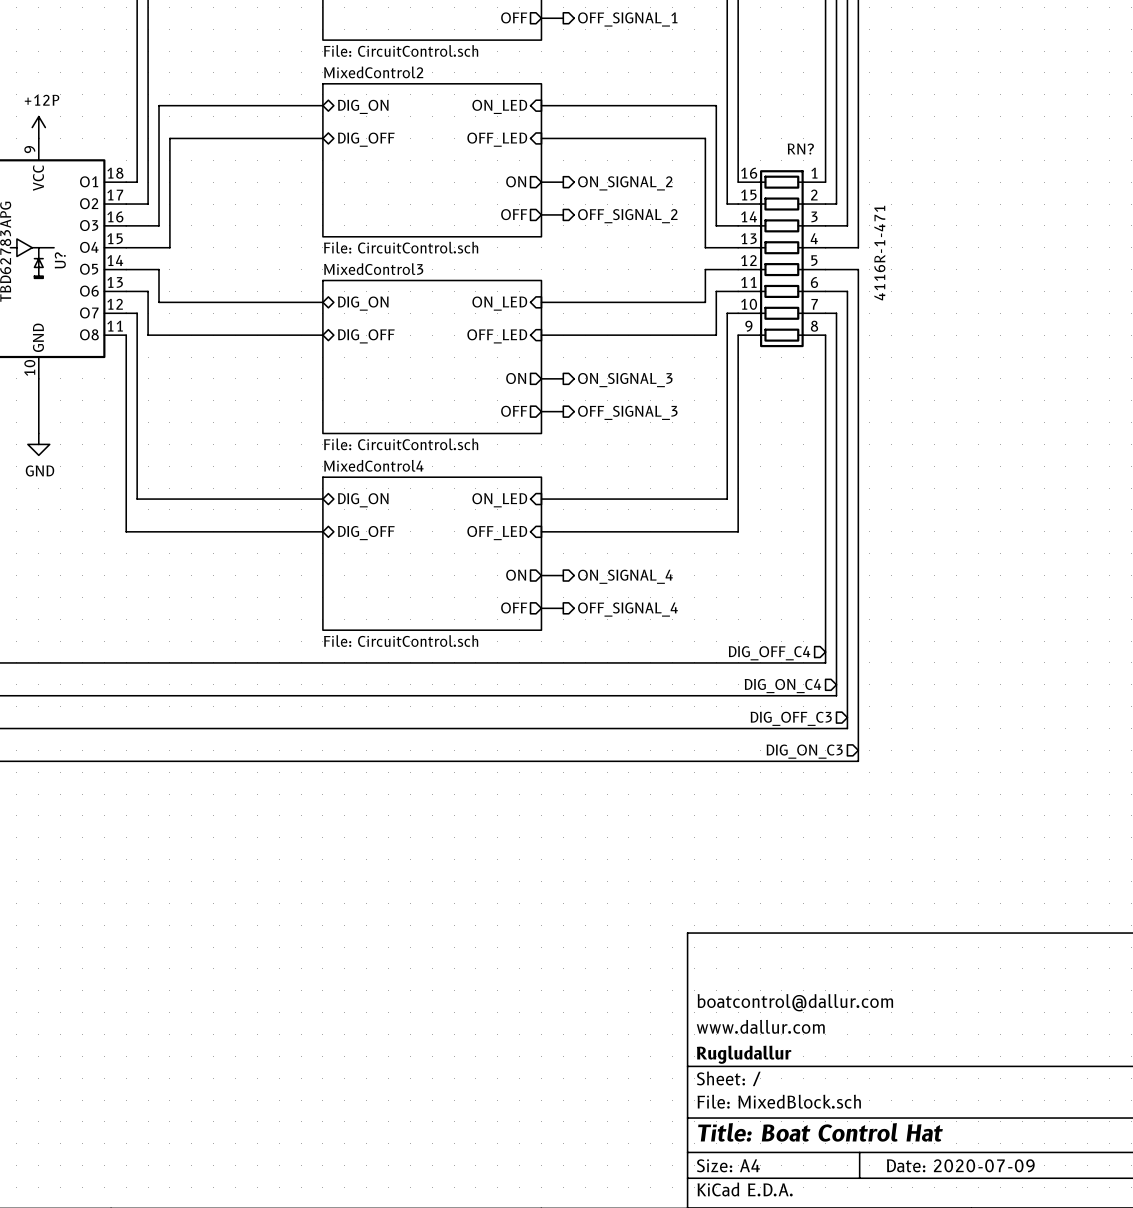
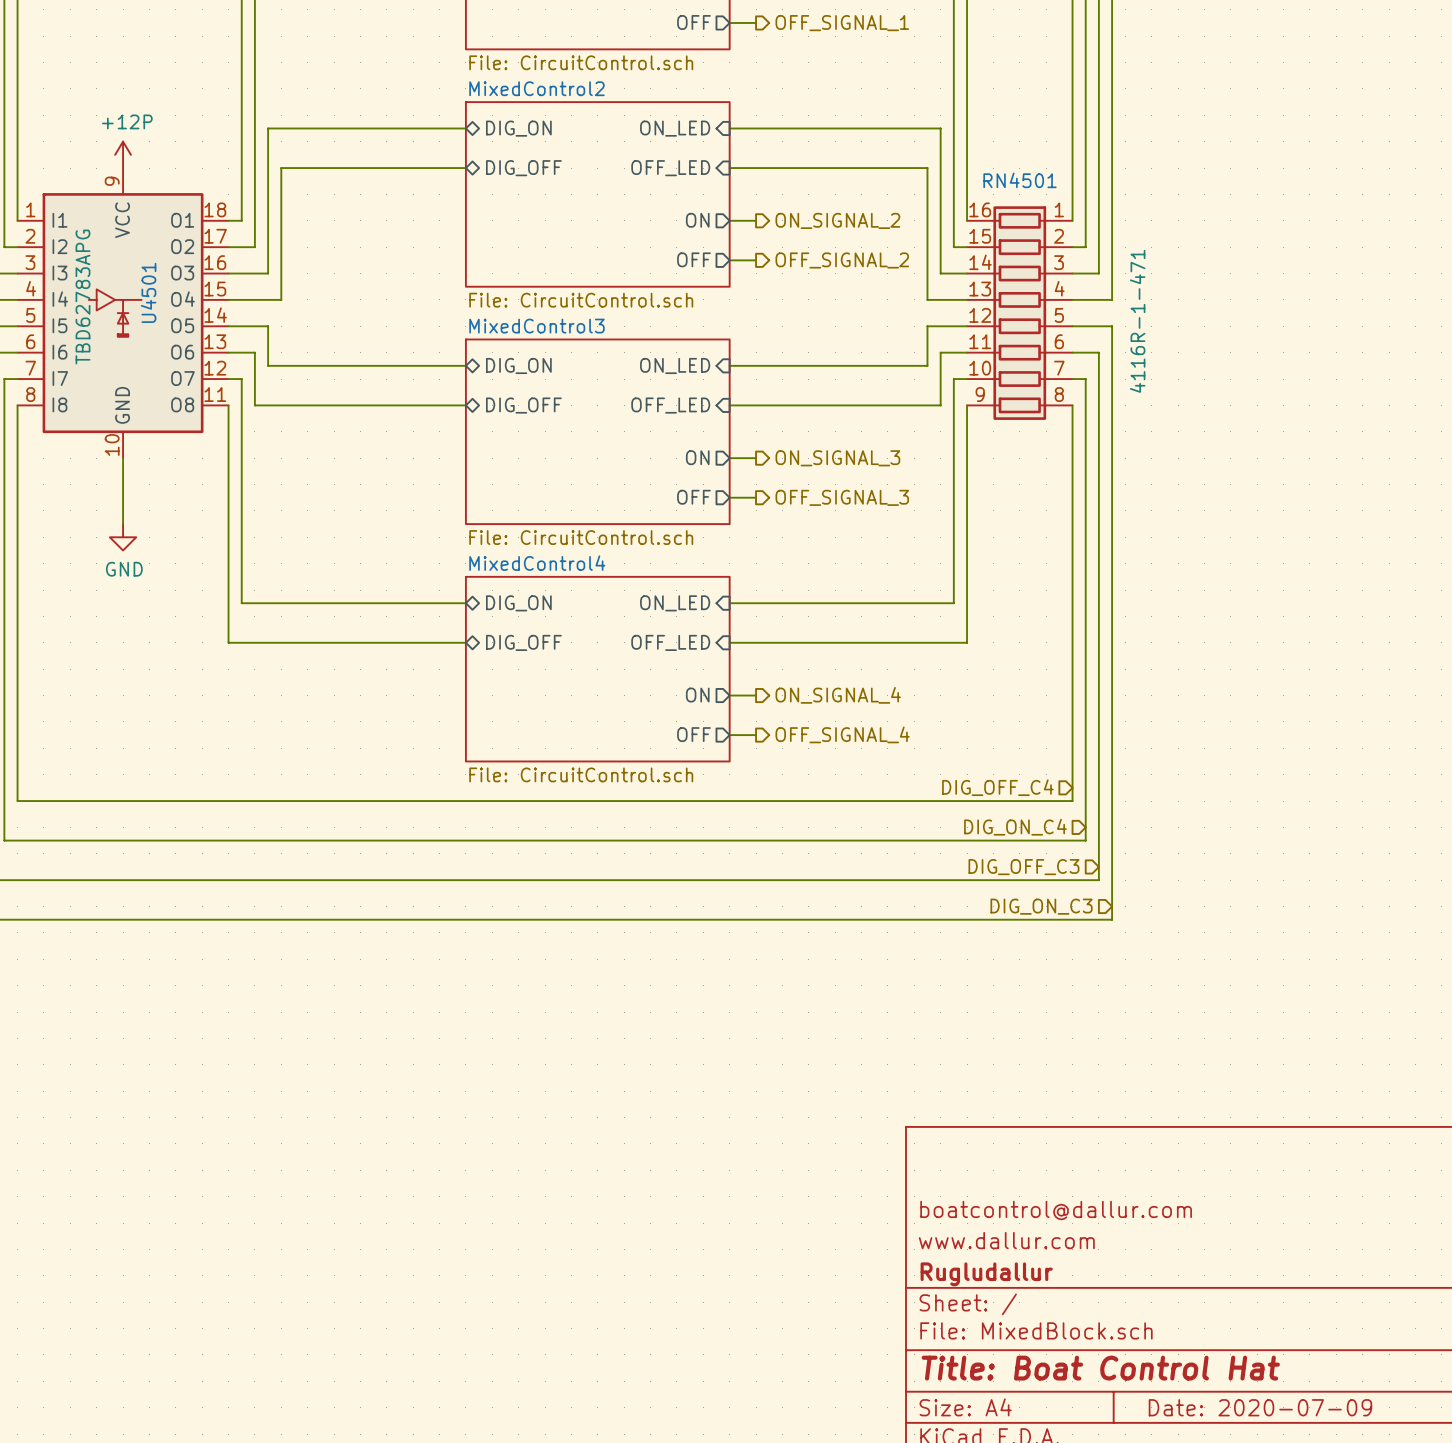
RN? name: RN? (800, 149) -> RN4501 (1019, 180)
U? name: U? (60, 260) -> U4501 (148, 292)

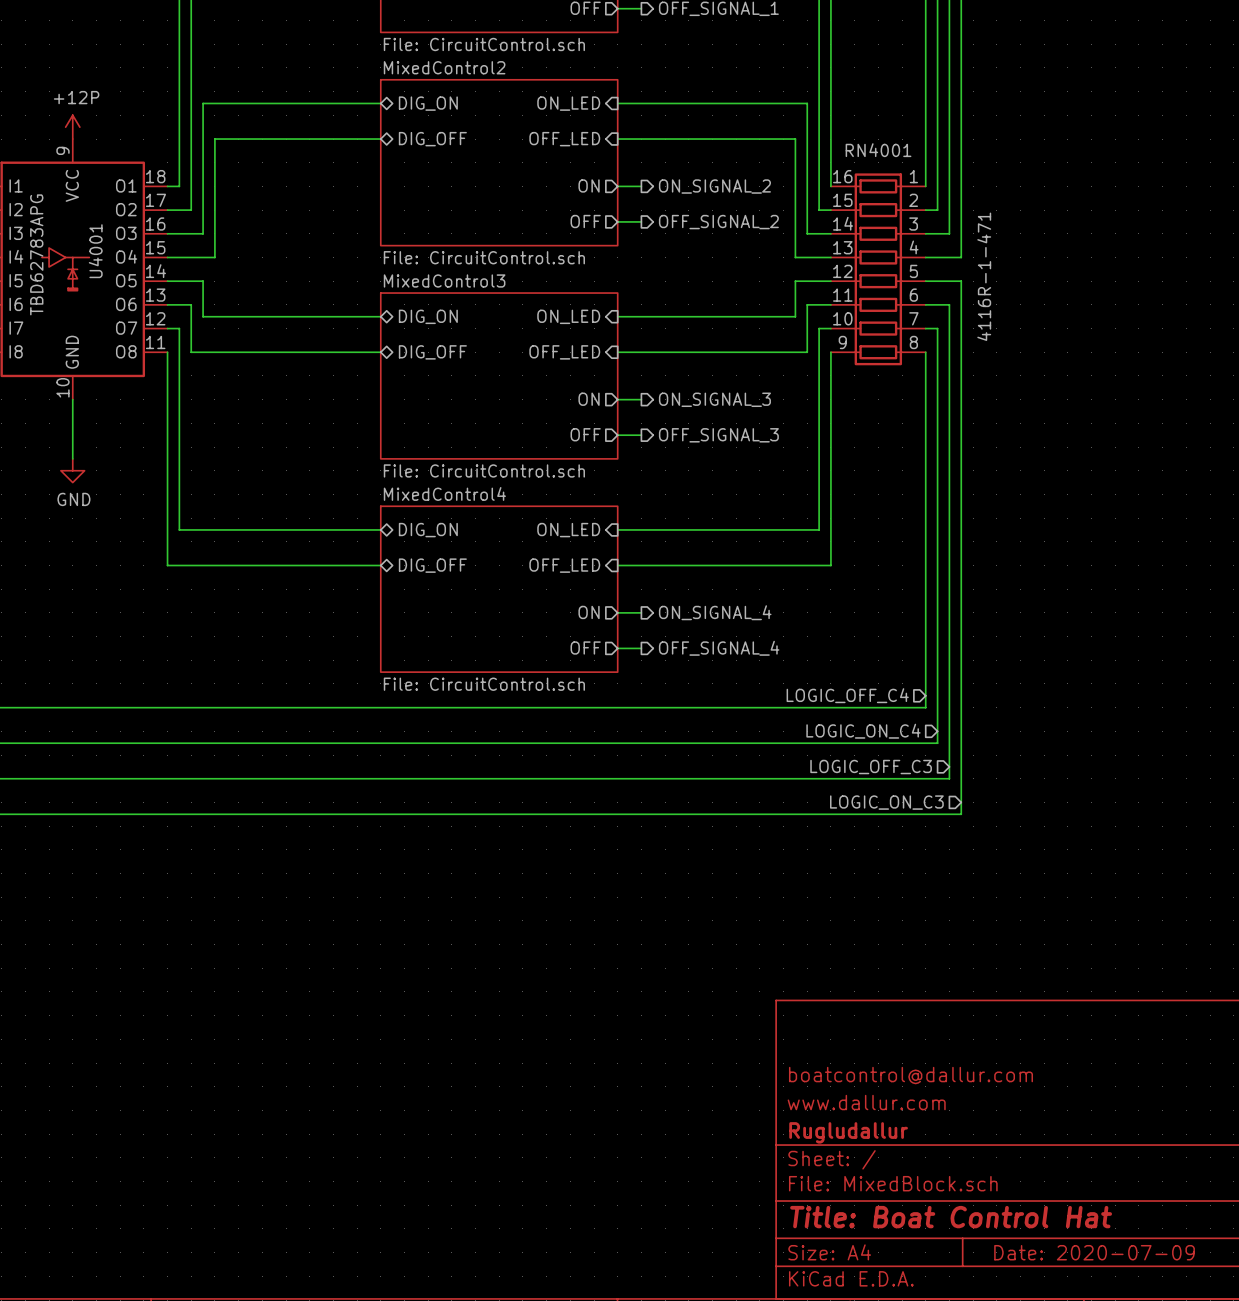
RN4501 name: RN4501 (1019, 180) -> RN4001 (878, 150)
U4501 name: U4501 (148, 292) -> U4001 (95, 251)
hierarchical label: DIG_OFF_C4 (997, 787) -> LOGIC_OFF_C4 (847, 695)
hierarchical label: DIG_ON_C4 (1015, 827) -> LOGIC_ON_C4 (863, 731)
hierarchical label: DIG_OFF_C3 (1023, 867) -> LOGIC_OFF_C3 (871, 767)
hierarchical label: DIG_ON_C3 (1041, 906) -> LOGIC_ON_C3 (886, 802)

